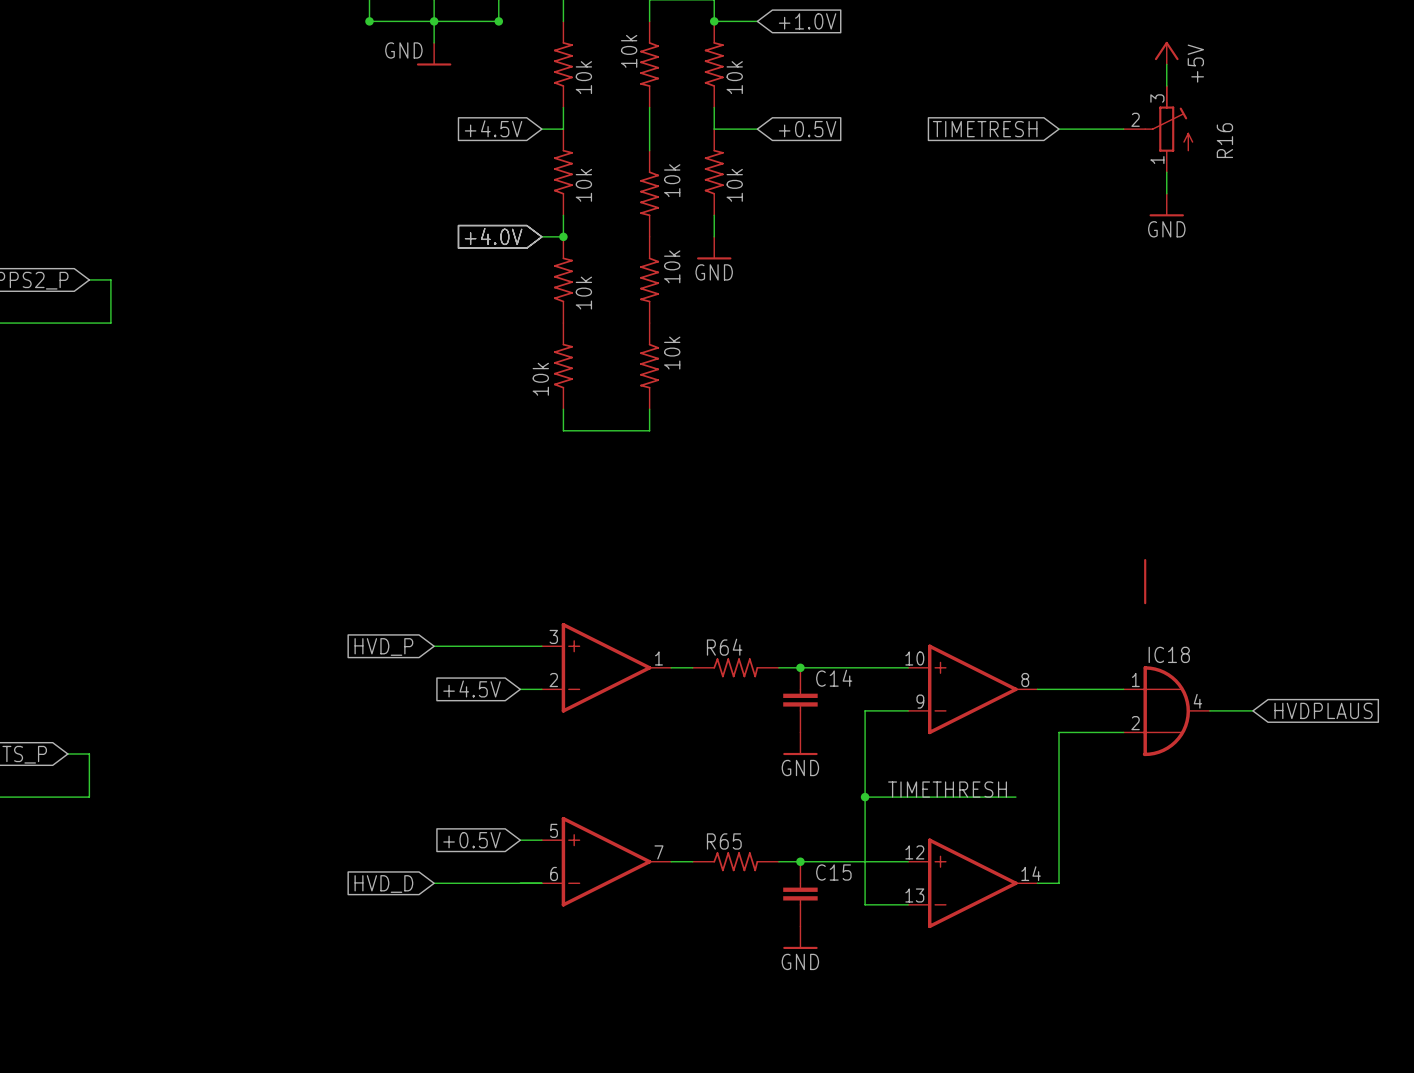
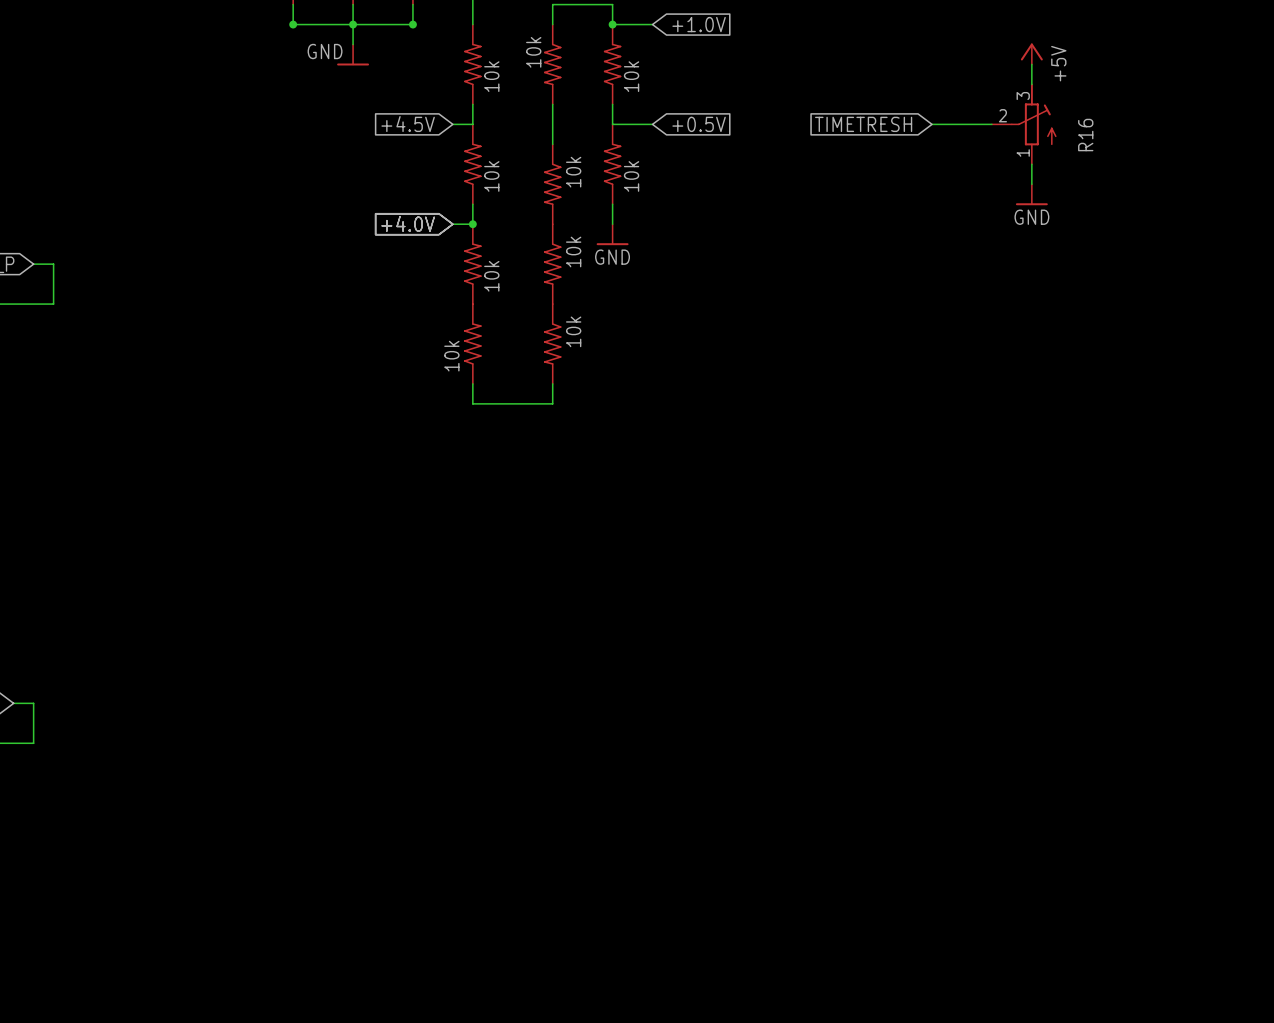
line: (1145, 560) (1145, 603) -> none
global label: HVD_P (383, 646) -> none
wire: (434, 646) (541, 646) -> none
part: (606, 667) -> none
wire: (671, 667) (692, 667) -> none
R64: (735, 667) -> none
wire: (778, 667) (908, 667) -> none
junction: (800, 667) -> none
global label: +4.5V (472, 689) -> none
wire: (520, 689) (541, 689) -> none
part: (972, 689) -> none
wire: (1037, 689) (1123, 689) -> none
C14: (800, 700) -> none
wire: (908, 710) (865, 710) (865, 904) (908, 904) -> none
wire: (1209, 710) (1252, 710) -> none
global label: HVDPLAUS (1323, 710) -> none
IC18: (1166, 711) -> none
wire: (1123, 732) (1059, 732) (1059, 883) (1037, 883) -> none
power symbol: GND (800, 743) -> none
label: TIMETHRESH (947, 789) -> none
wire: (865, 797) (1015, 797) -> none
junction: (865, 797) -> none
global label: +0.5V (472, 840) -> none
wire: (520, 840) (541, 840) -> none
part: (606, 861) -> none
wire: (671, 861) (692, 861) -> none
R65: (735, 861) -> none
wire: (778, 861) (908, 861) -> none
junction: (800, 861) -> none
wire: (434, 883) (541, 883) -> none
part: (972, 883) -> none
global label: HVD_D (383, 884) -> none
C15: (800, 894) -> none
power symbol: GND (800, 937) -> none

